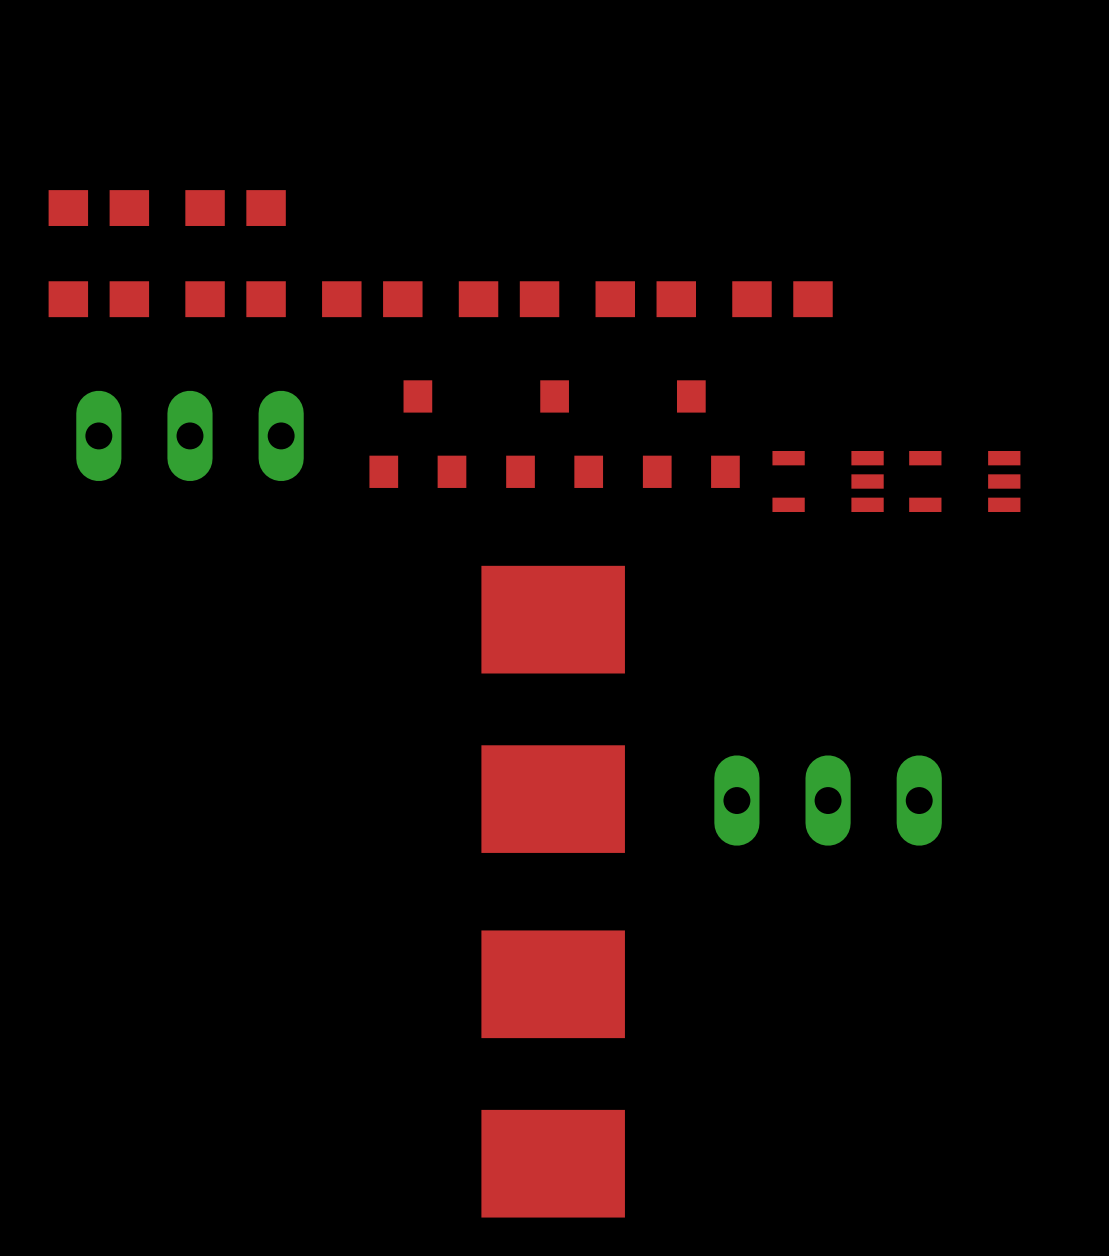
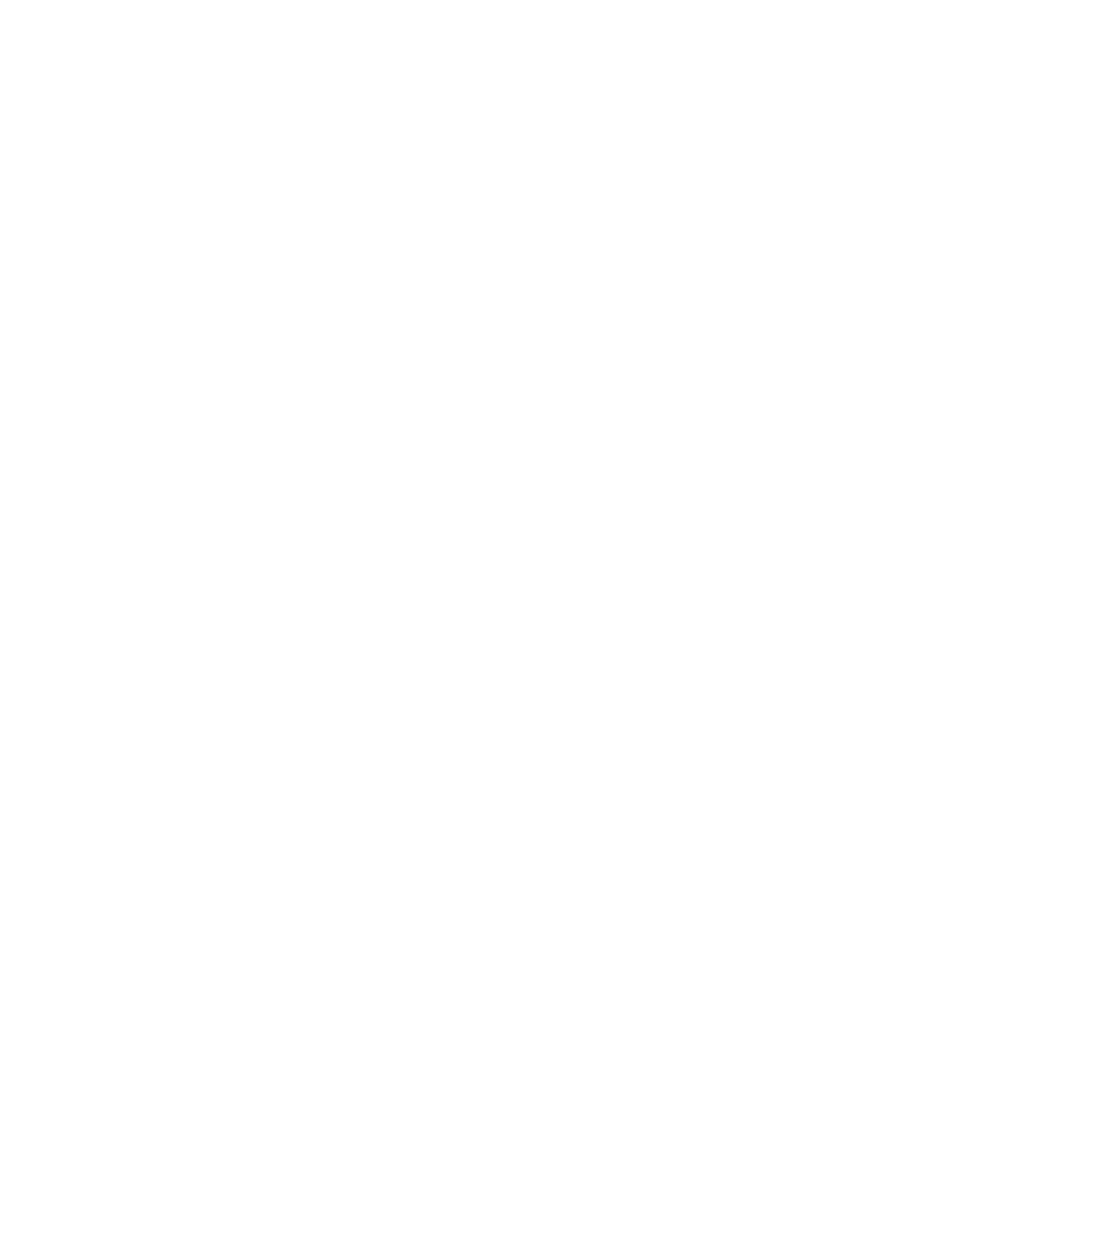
part: (98, 208) -> none
part: (235, 208) -> none
part: (98, 299) -> none
part: (235, 299) -> none
part: (372, 299) -> none
part: (509, 299) -> none
part: (645, 299) -> none
part: (782, 299) -> none
part: (417, 434) -> none
part: (554, 434) -> none
part: (691, 434) -> none
part: (189, 435) -> none
part: (828, 481) -> none
part: (964, 481) -> none
part: (553, 709) -> none
part: (828, 800) -> none
part: (553, 1074) -> none

